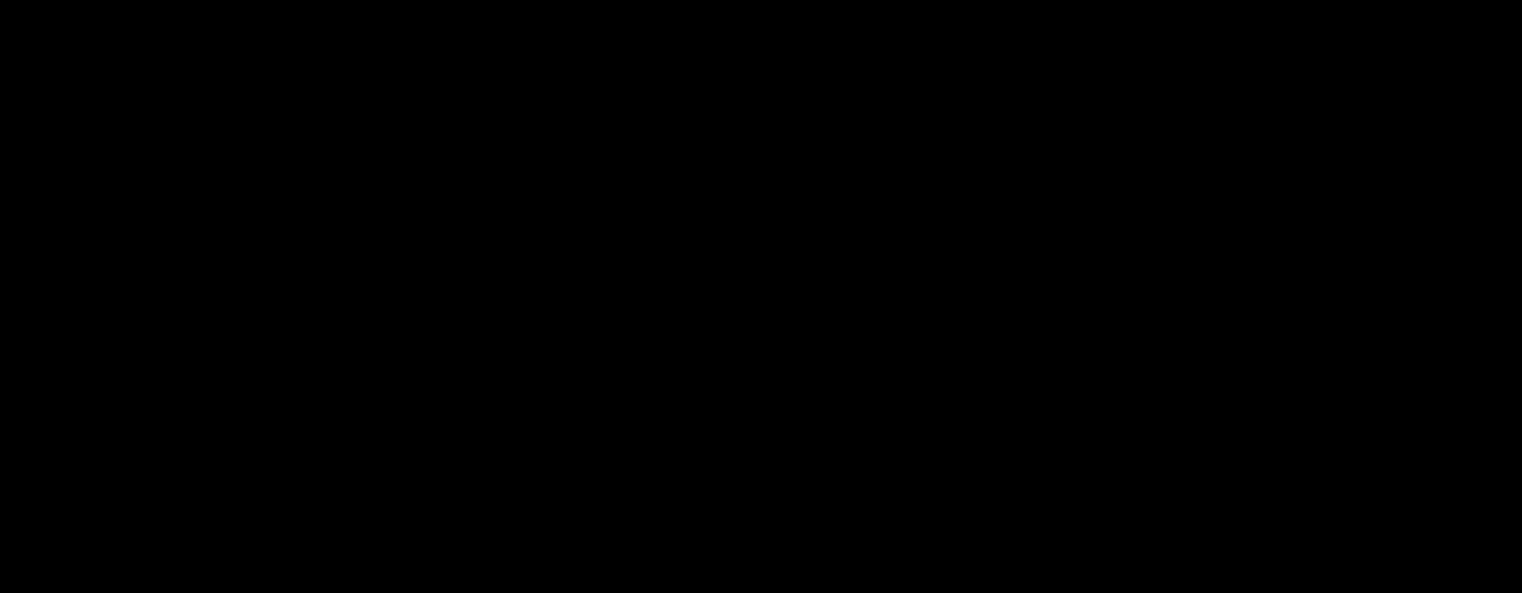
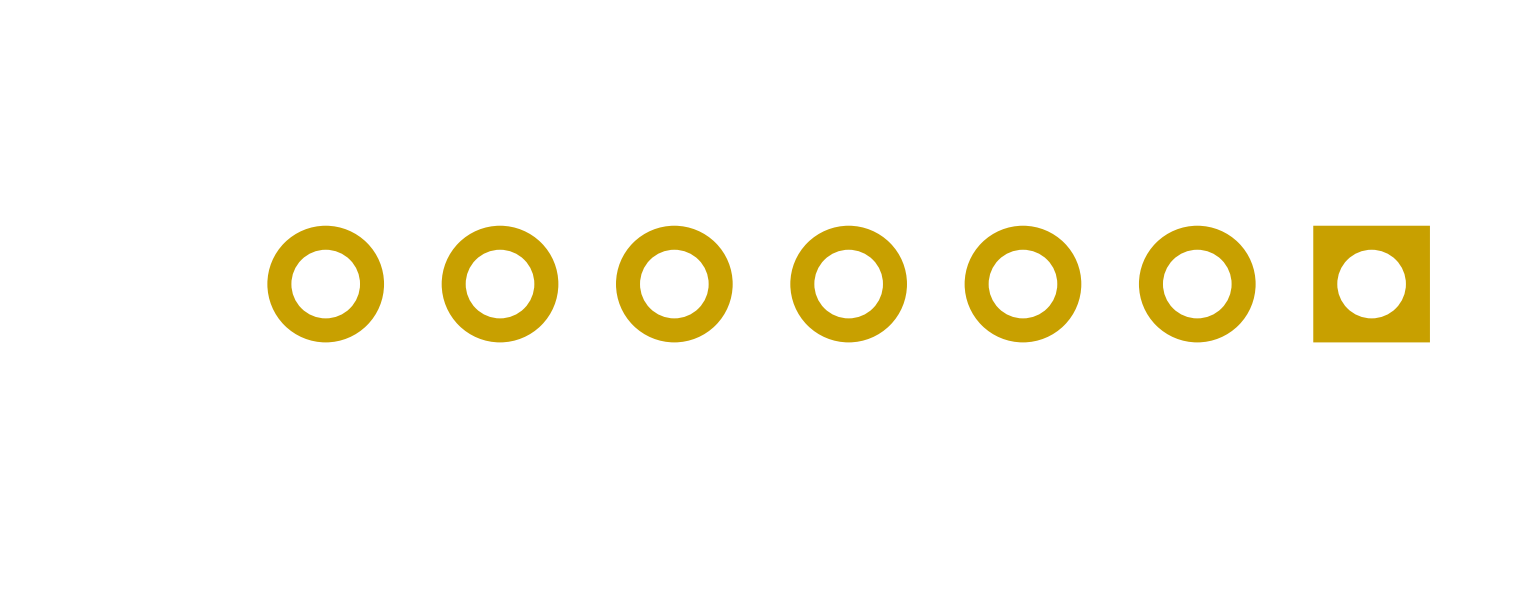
part: none -> (848, 284)

